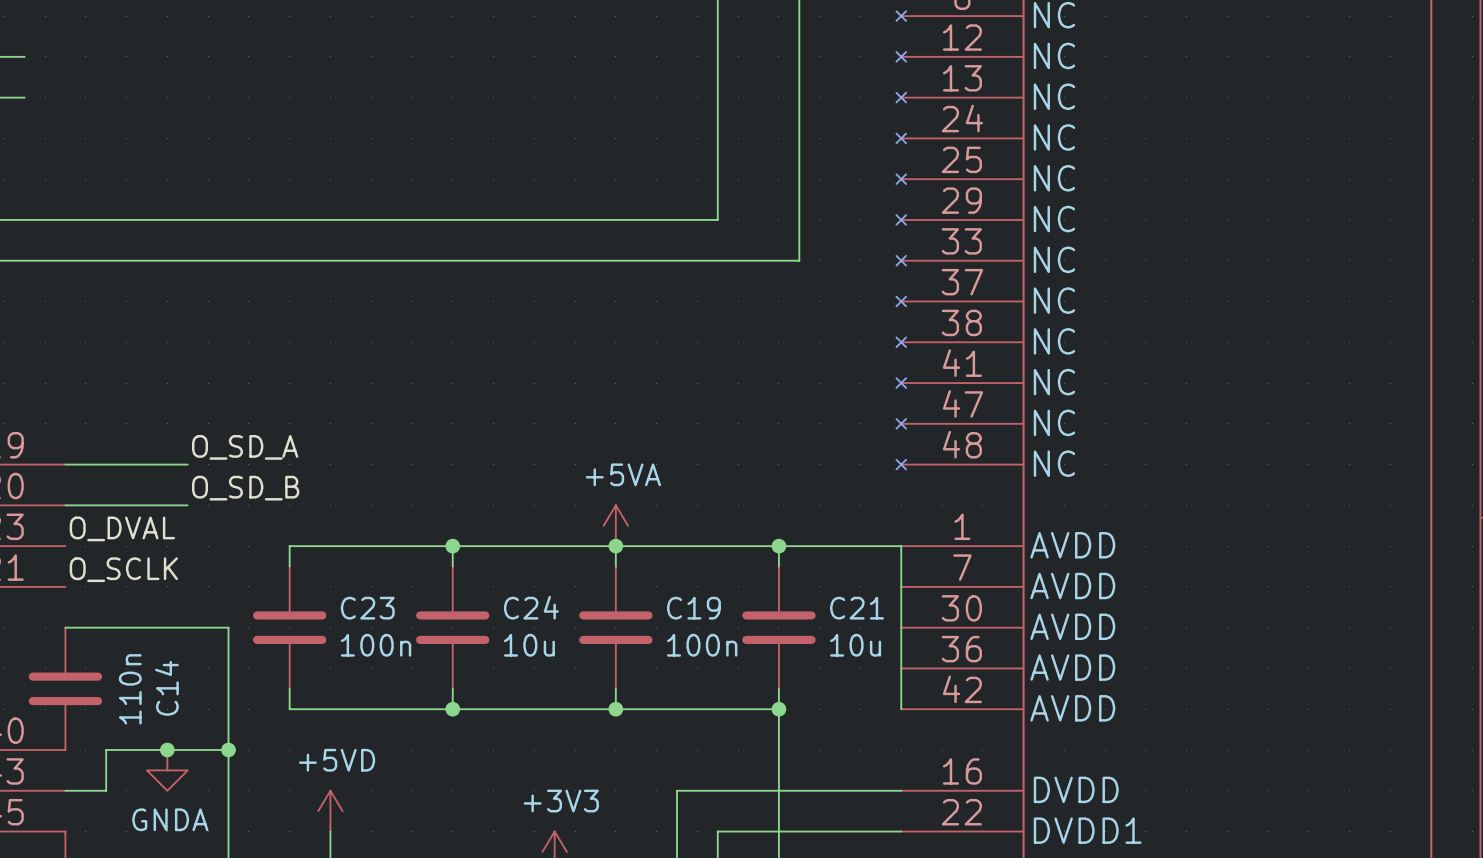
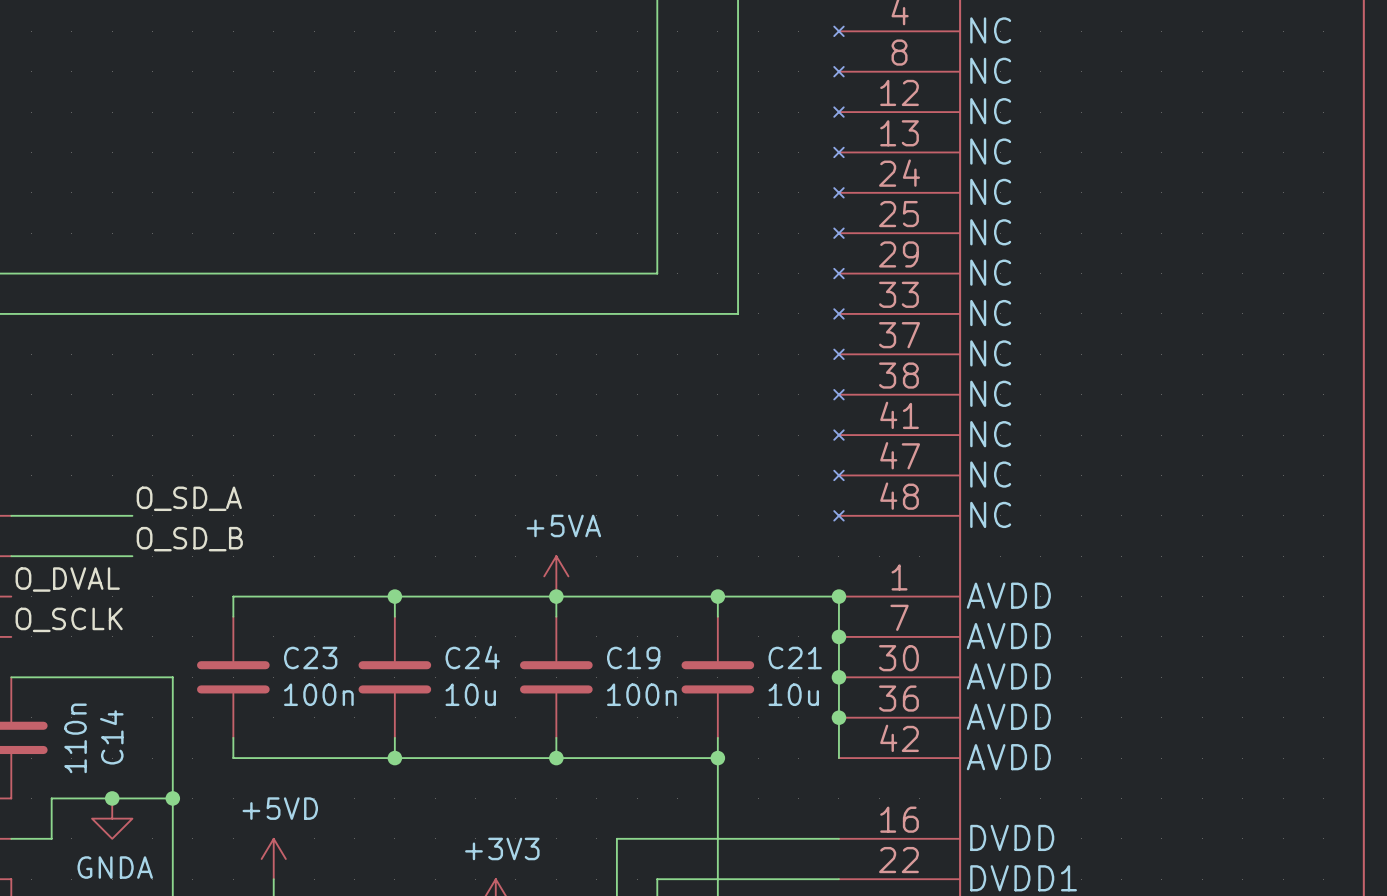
junction: none -> (838, 596)
junction: none -> (838, 636)
junction: none -> (838, 677)
junction: none -> (838, 717)

